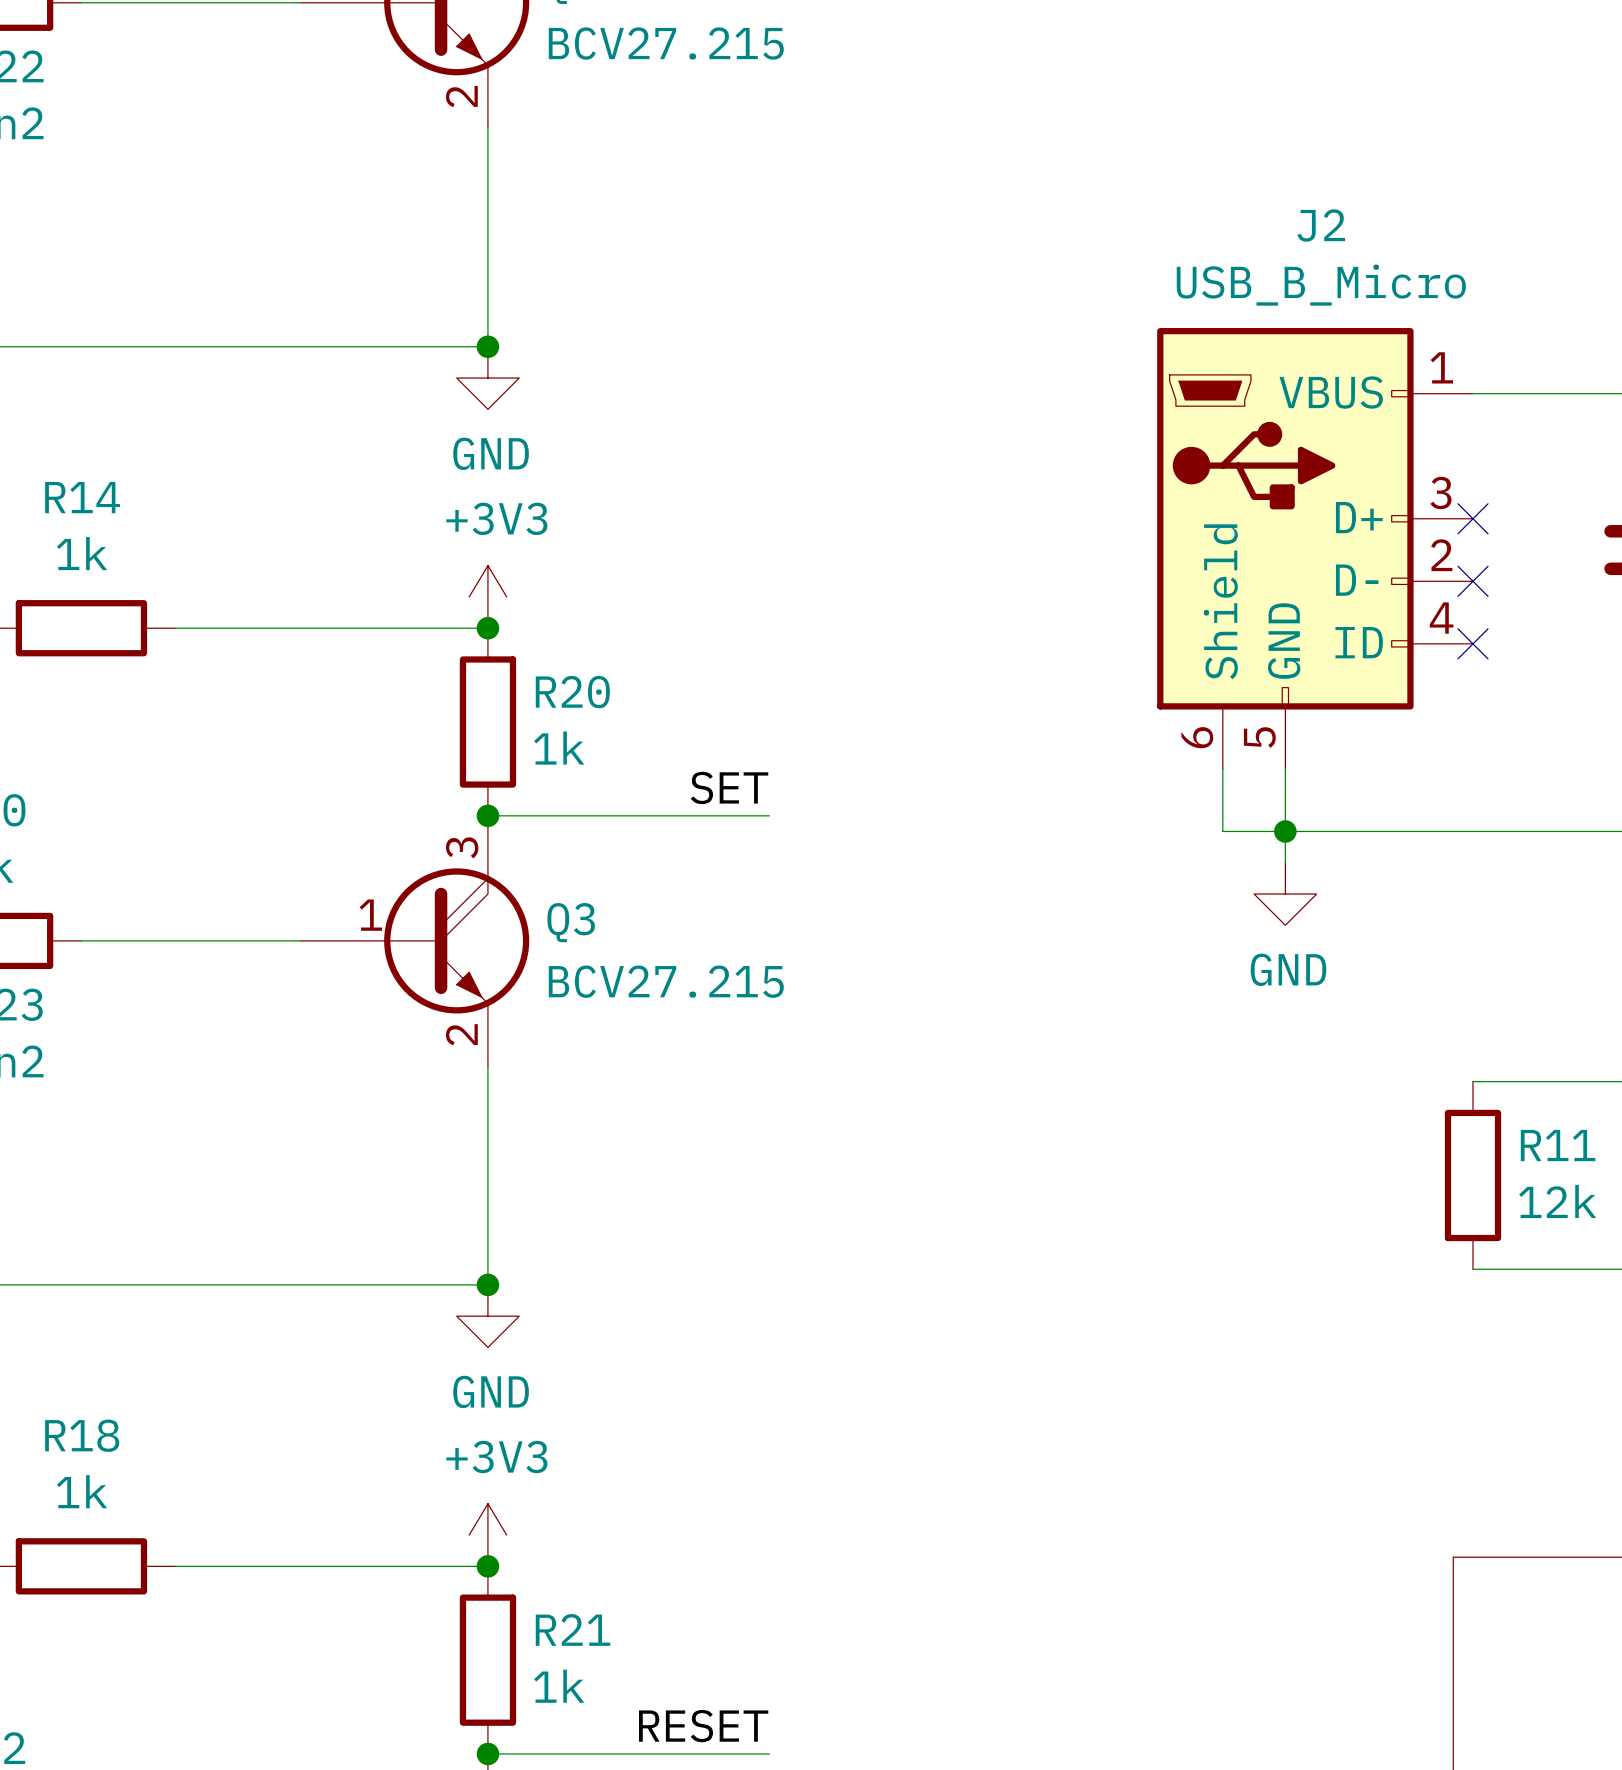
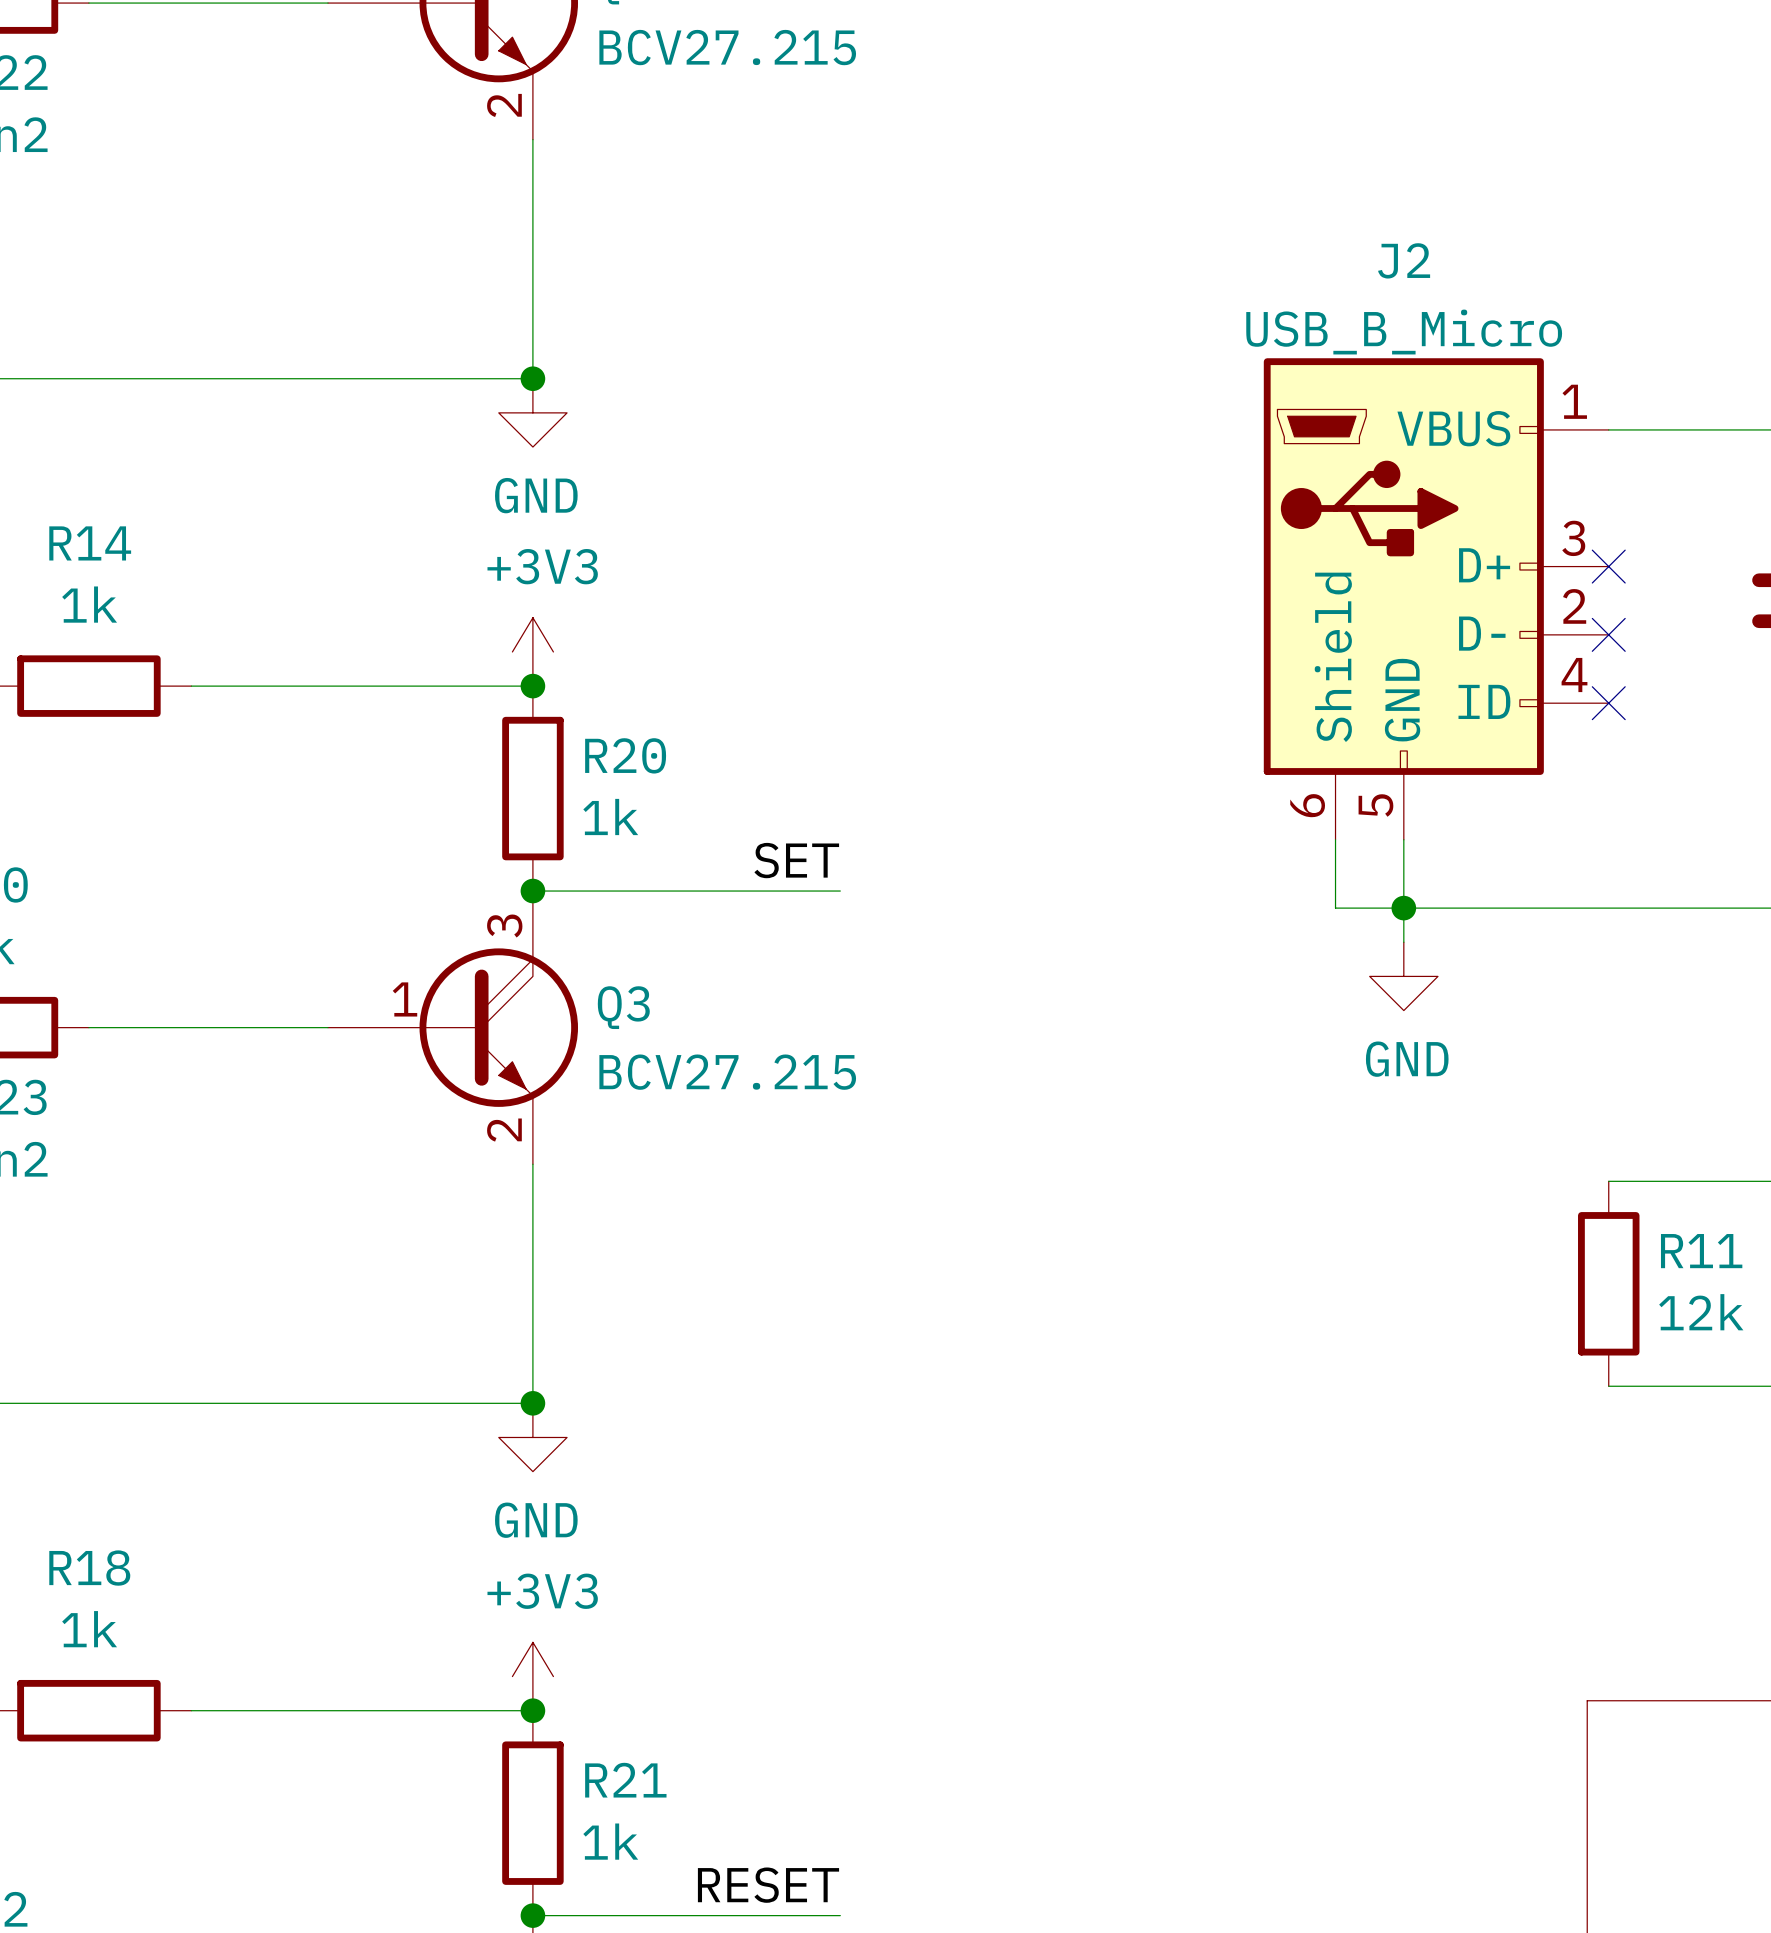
J2 name position: J2 (1321, 225) -> J2 (1404, 260)
J2 value position: USB_B_Micro (1321, 285) -> USB_B_Micro (1404, 332)

